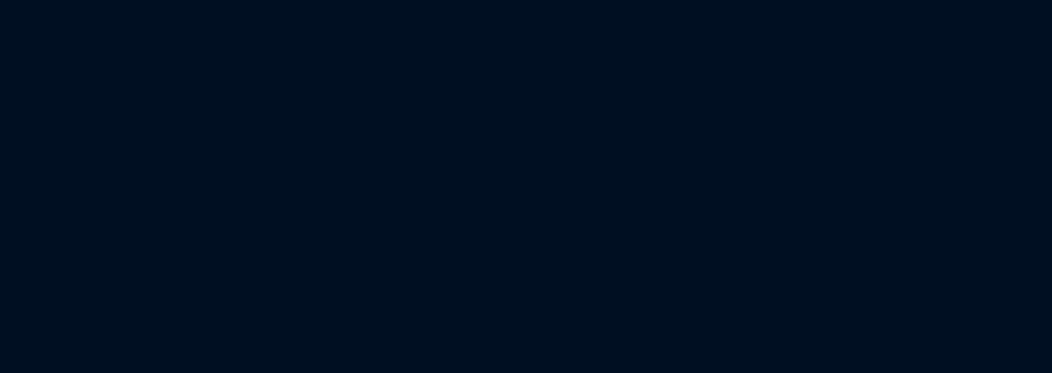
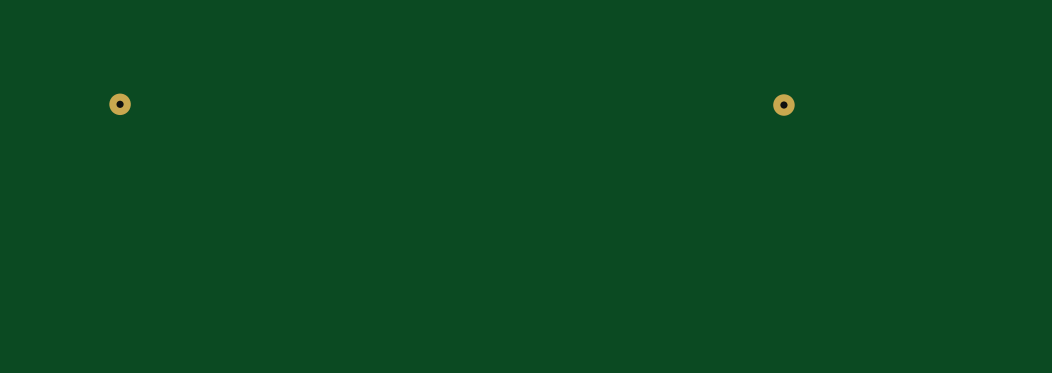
via: none -> (120, 104)
via: none -> (783, 105)

